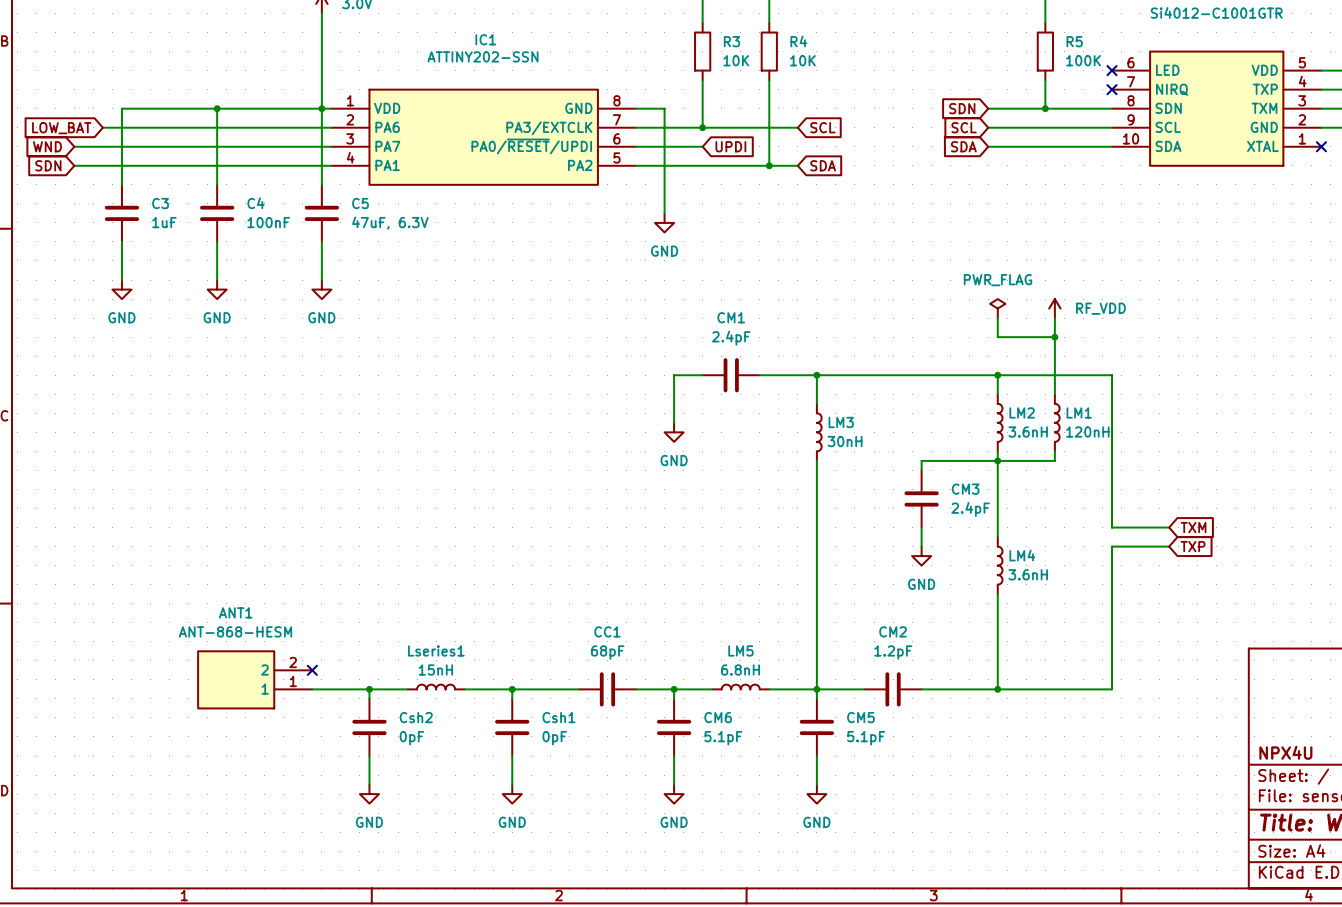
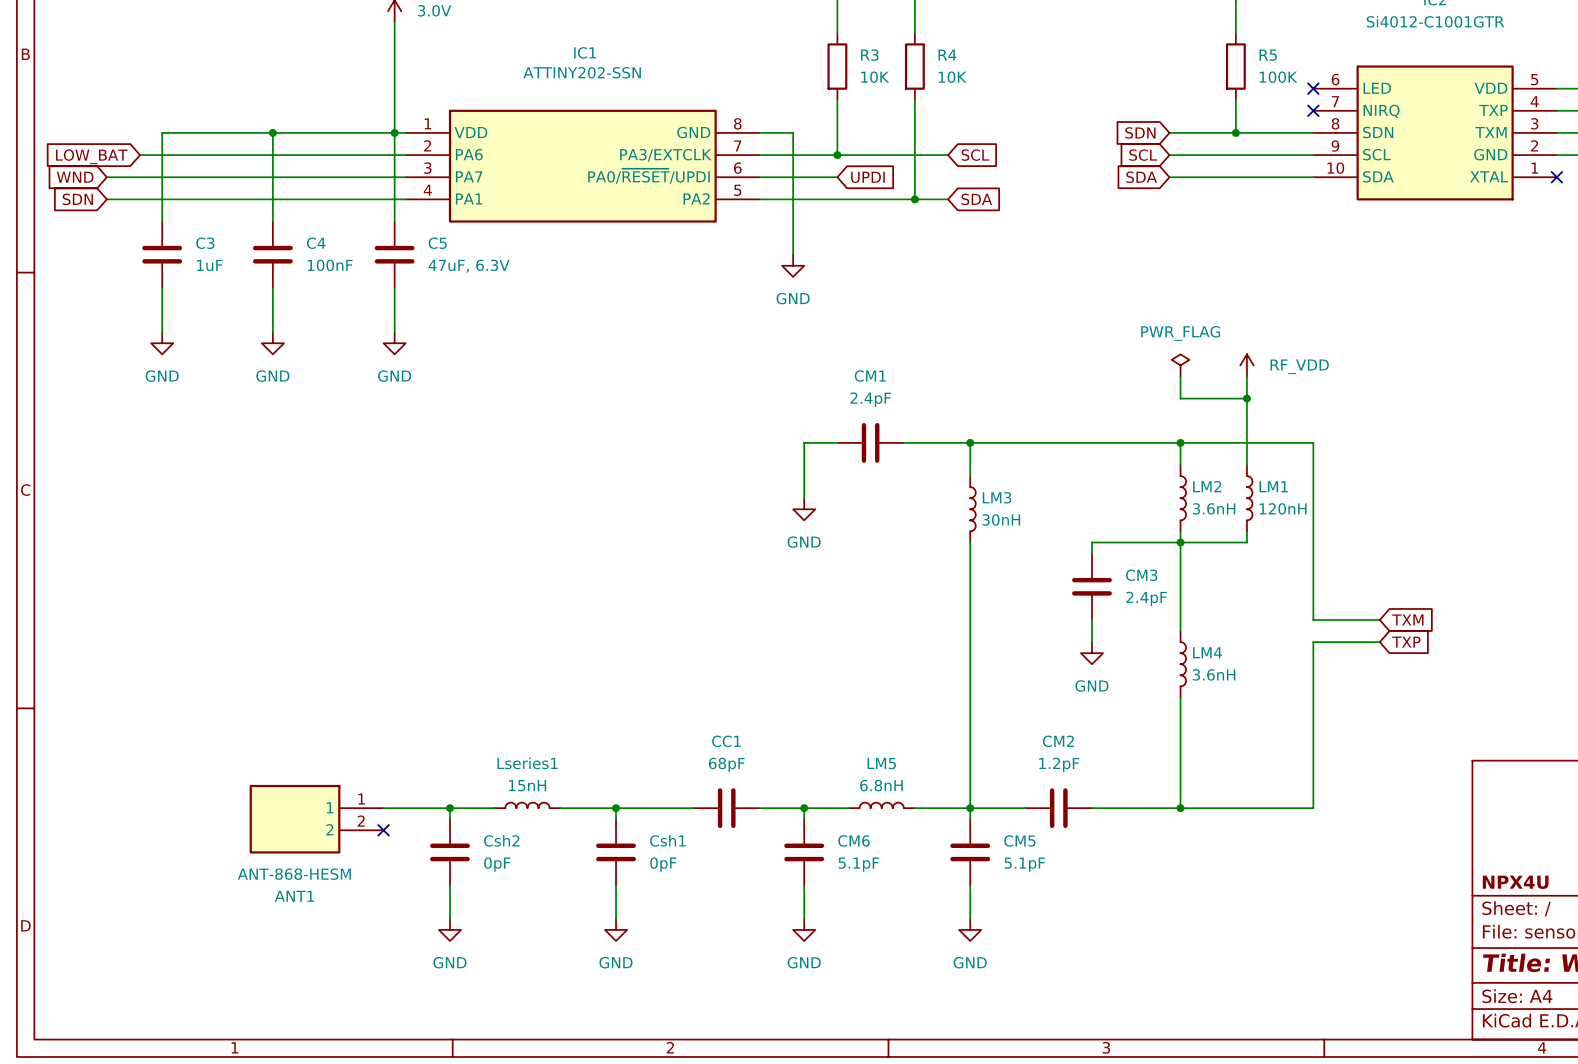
no-connect mark position: (312, 670) -> (383, 830)
ANT1 flip: as is (236, 679) -> up-down (295, 819)

